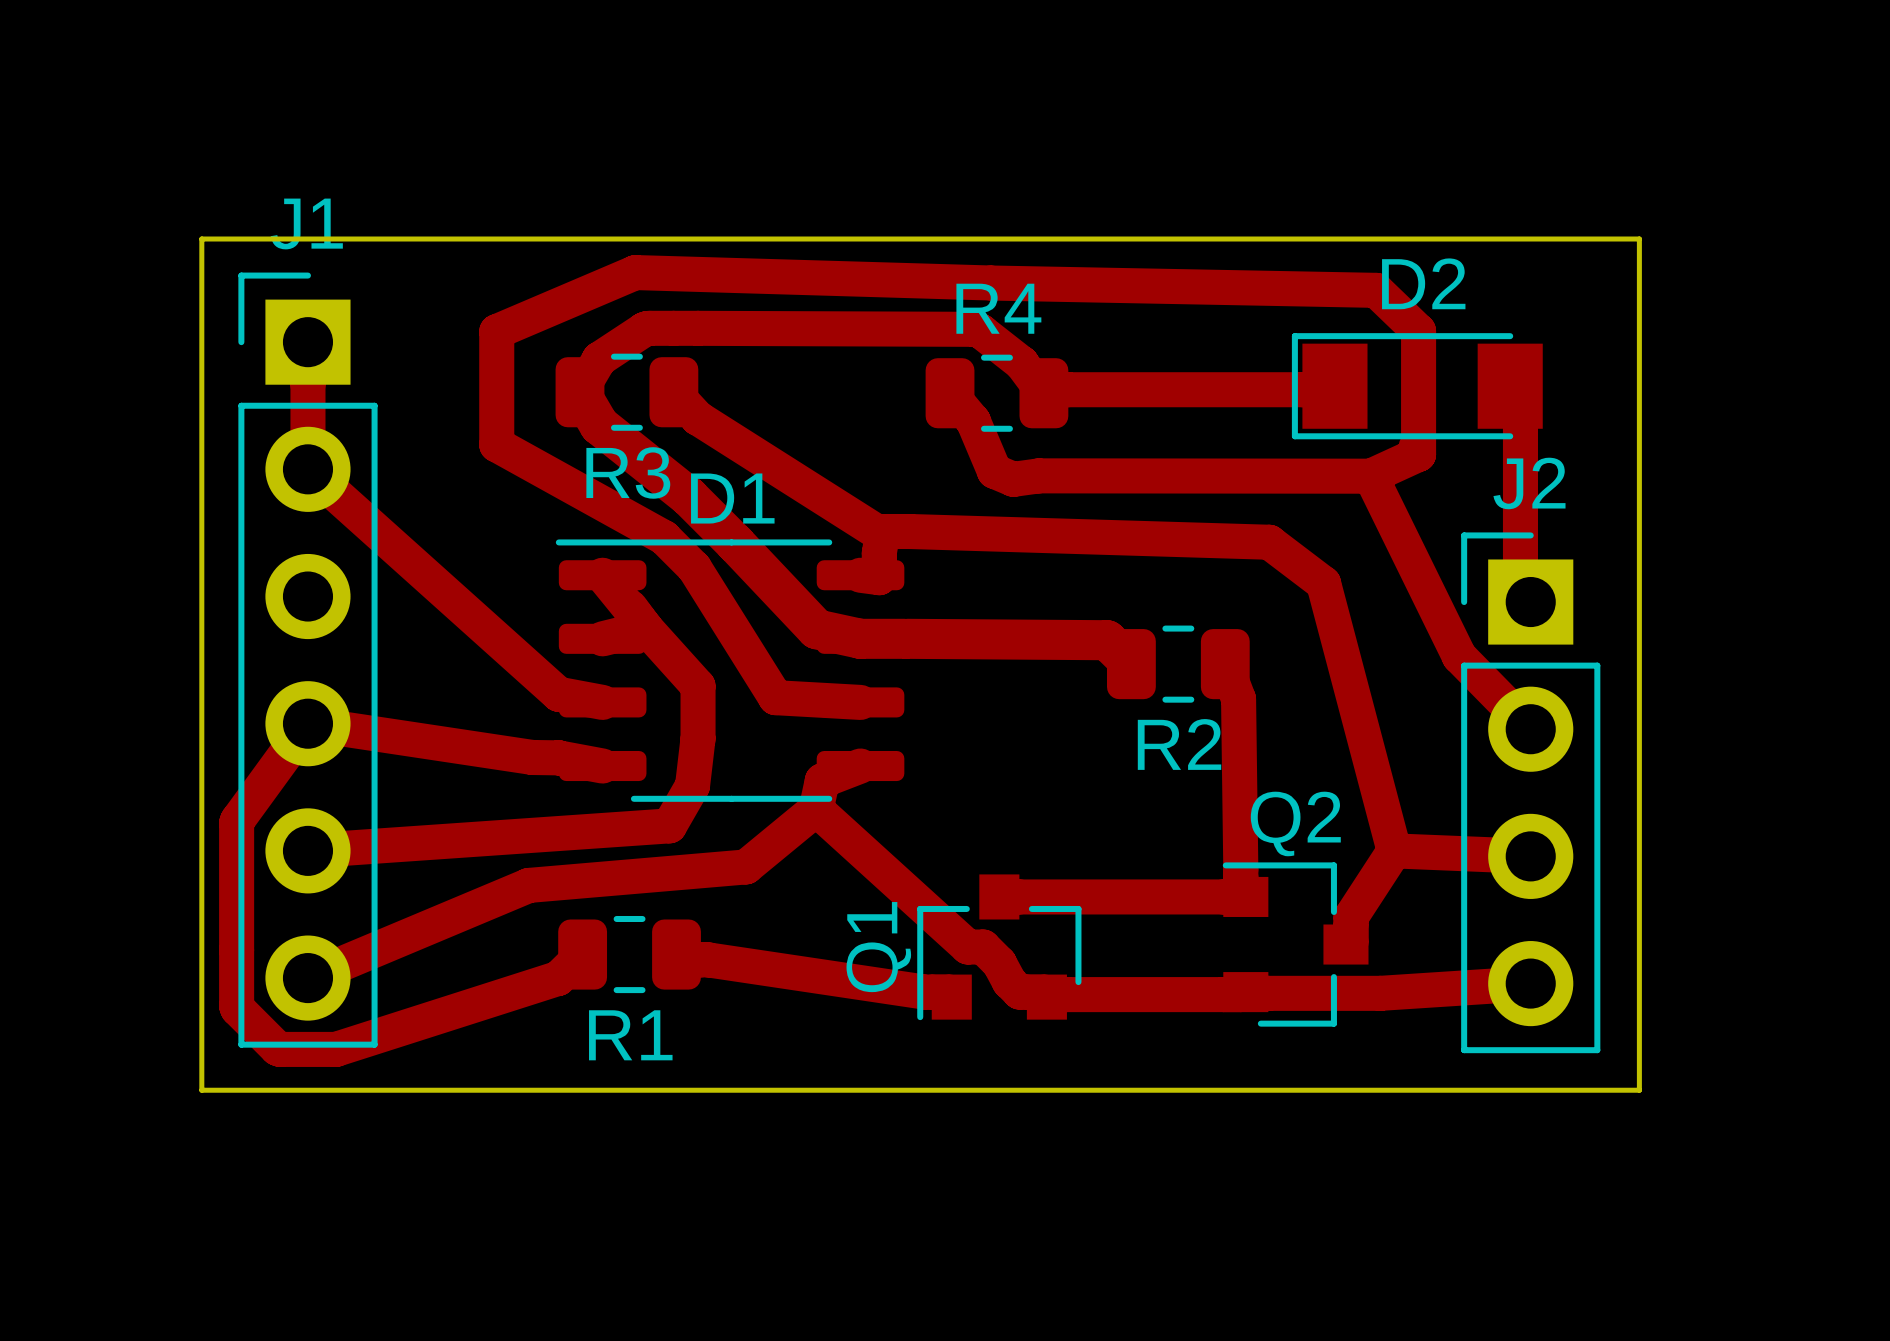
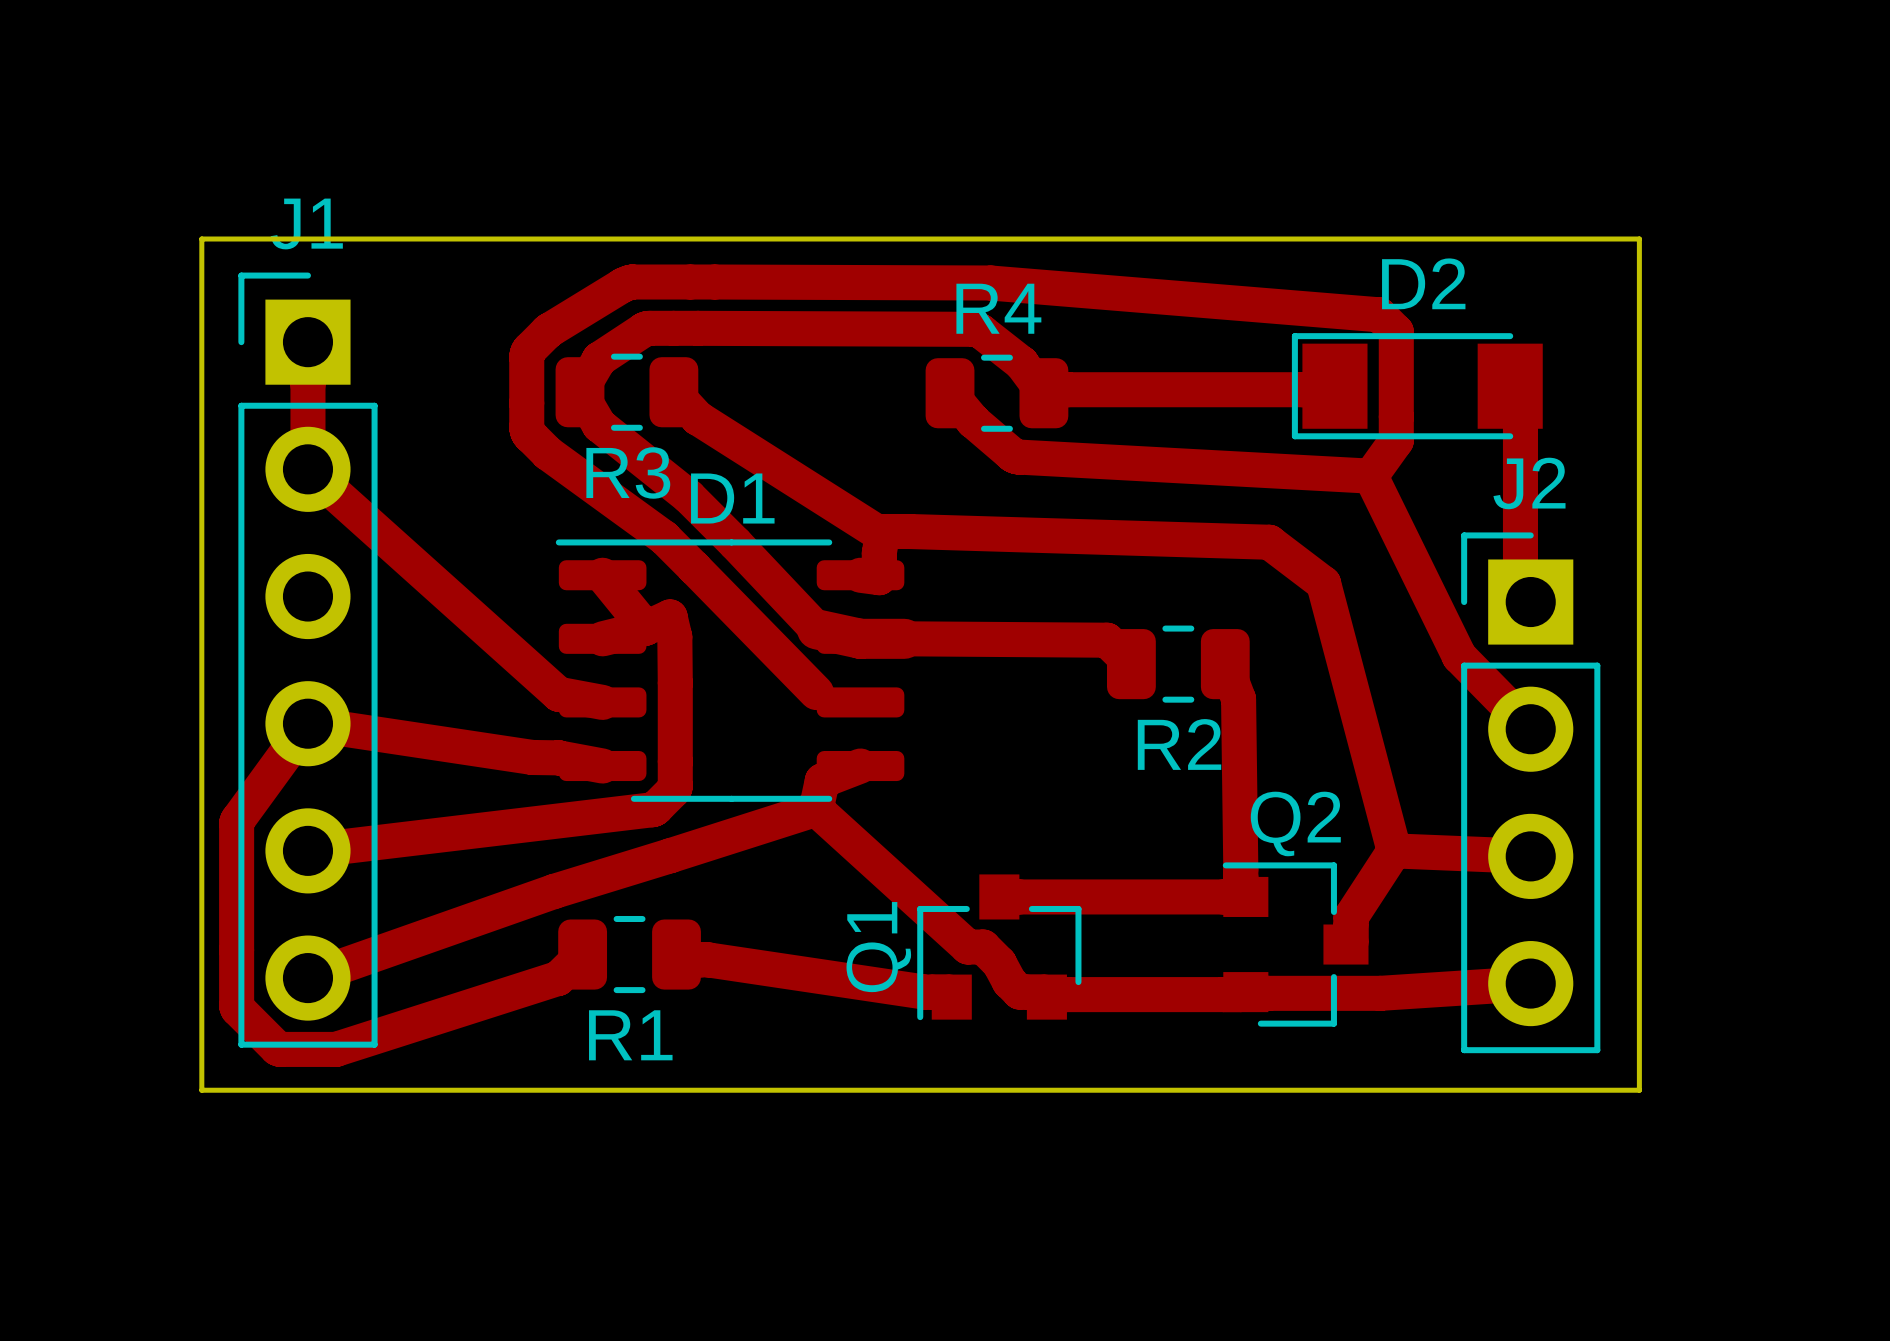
top track width: thick (579, 392) (599, 425) (688, 496) (816, 629) -> thin (579, 392) (599, 425) (688, 496) (816, 629)
top track: (973, 421) (994, 471) (1013, 479) (1039, 475) (1370, 476) (1418, 454) -> none
top track: (1418, 454) (1418, 331) (1376, 290) (990, 283) (635, 272) (496, 331) (496, 444) (664, 537) -> (973, 421) (1011, 454) (1017, 456) (1370, 476) (1396, 440) (1396, 331) (1379, 314) (990, 283) (628, 282) (549, 329) (528, 351) (526, 357) (526, 429) (529, 434) (547, 453) (664, 537)
top track: (694, 567) (775, 697) (860, 702) -> (694, 567) (816, 692)
top track: (630, 607) (645, 628) (698, 686) (698, 738) (692, 785) (669, 825) (307, 850) -> (645, 628) (670, 616) (674, 636) (675, 786) (654, 808) (307, 850)
top track width: thick (907, 638) (1107, 640) (1131, 664) -> thin (907, 638) (1107, 640) (1131, 664)
top track: (816, 809) (746, 866) (528, 885) (307, 978) -> (816, 809) (554, 891) (307, 978)

